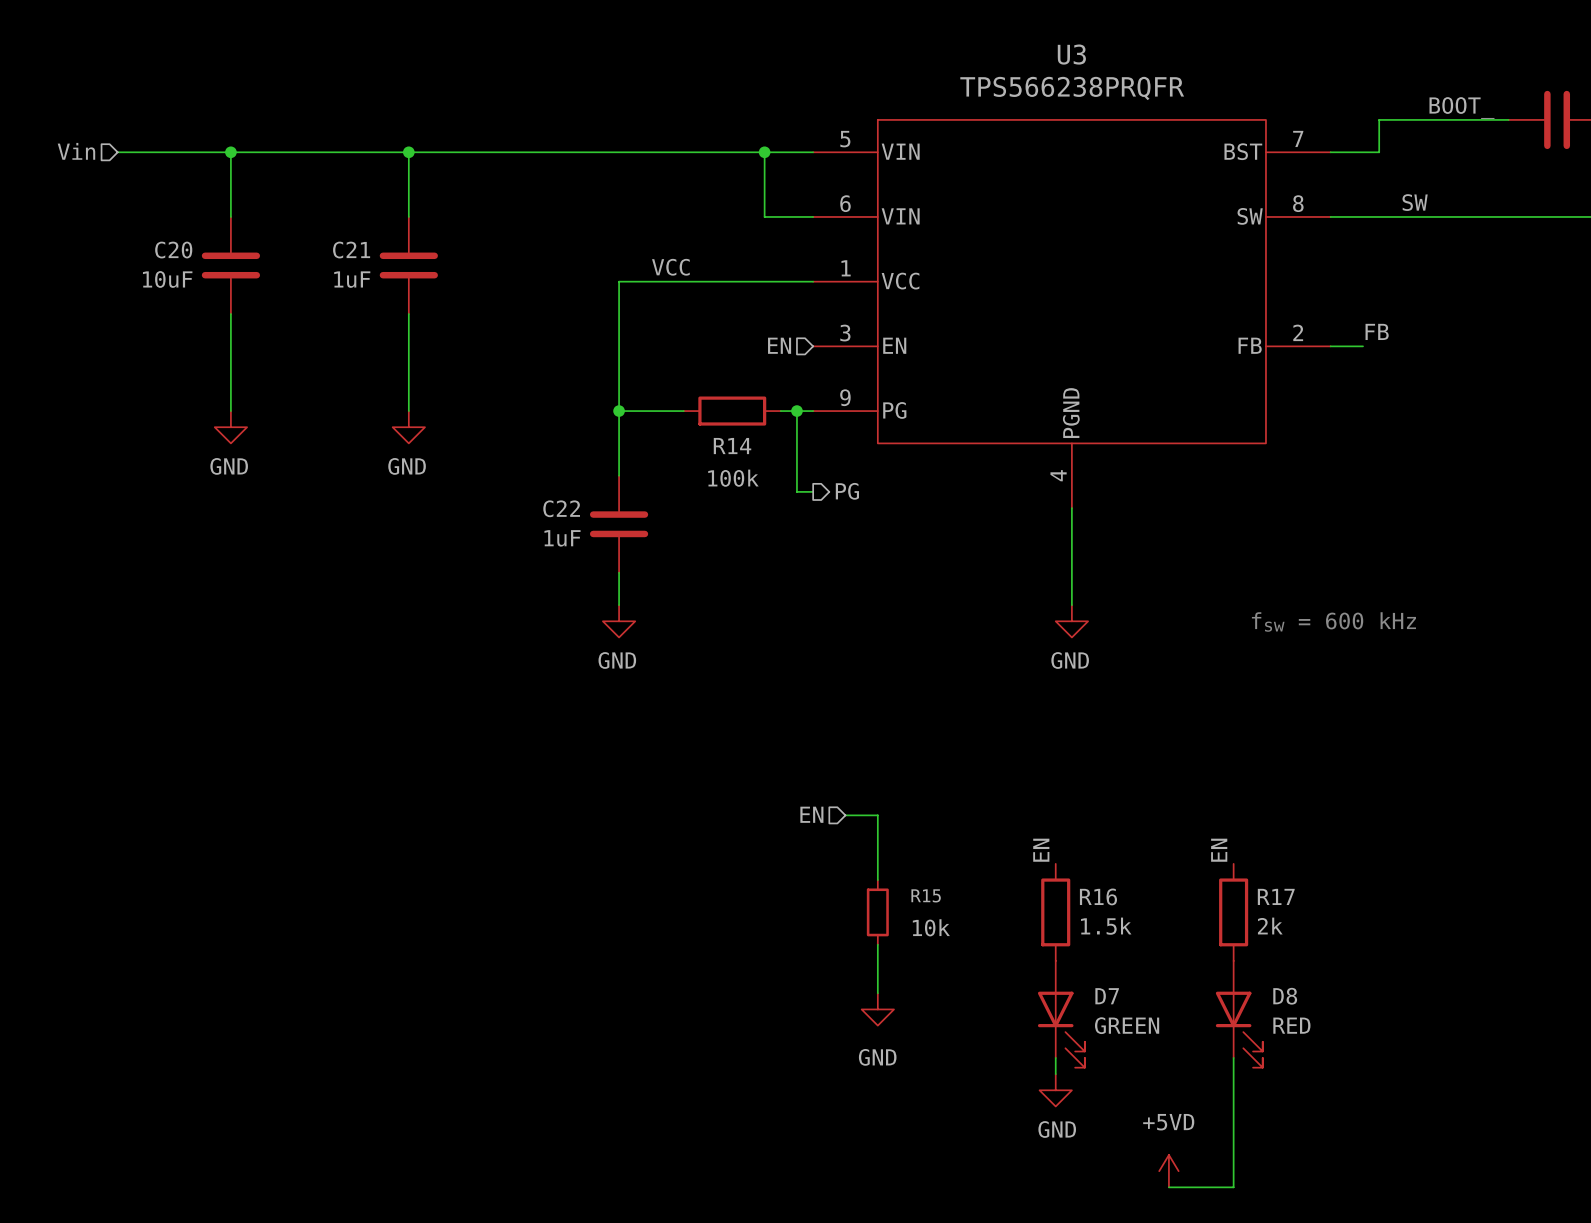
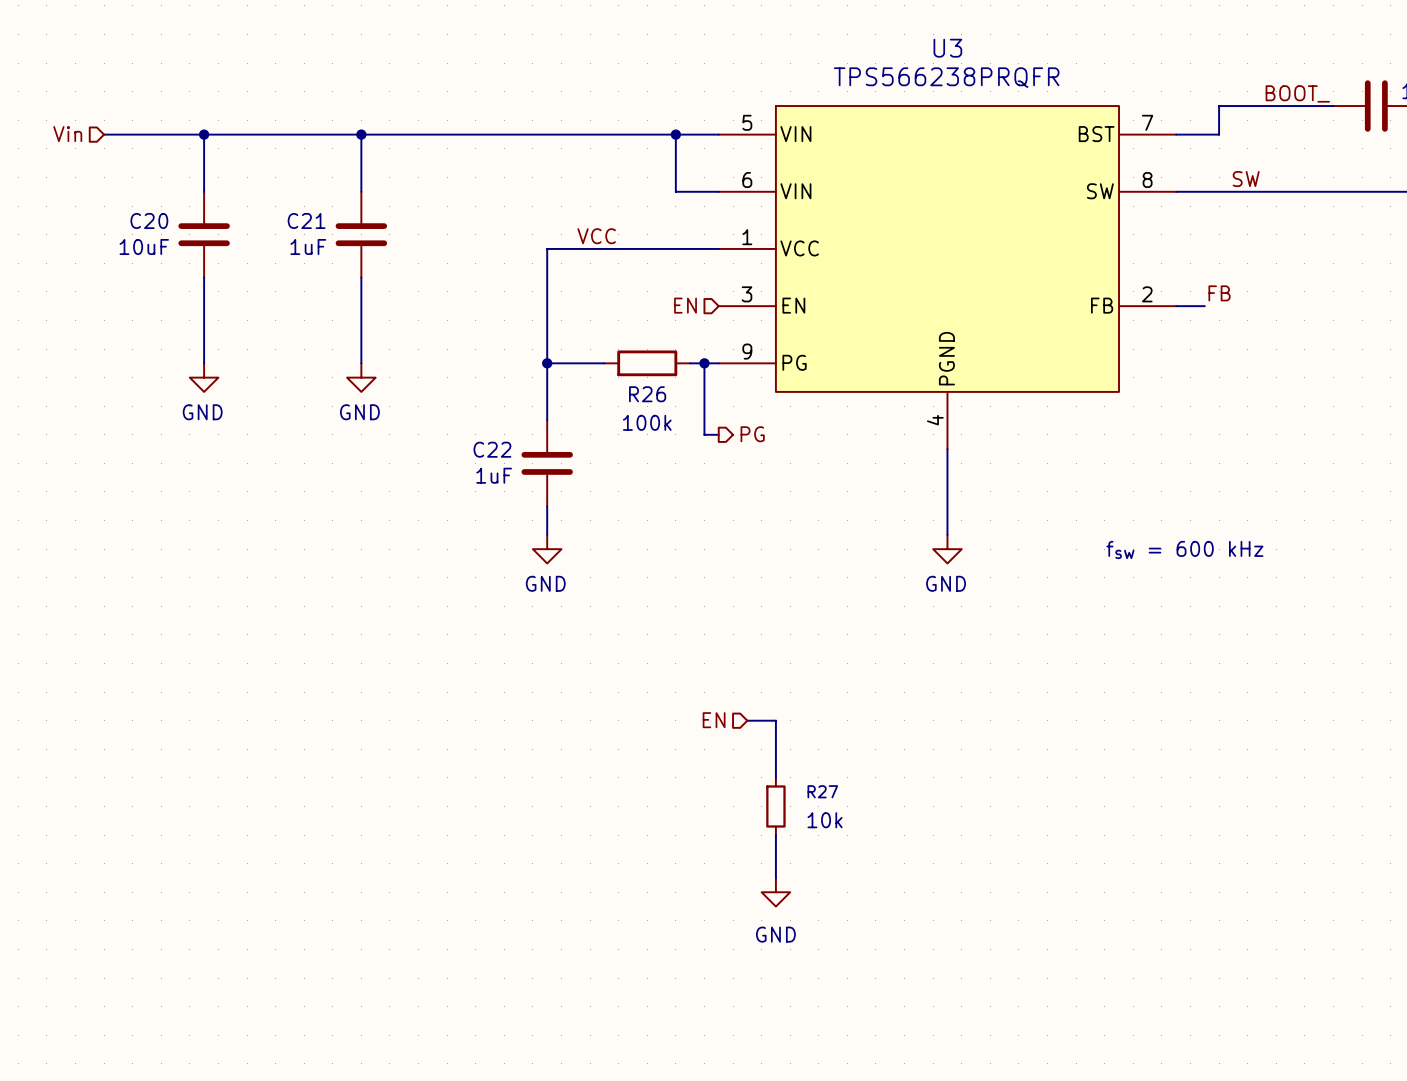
R14 name: R14 (732, 446) -> R26 (647, 394)
label: EN (1041, 850) -> none
label: EN (1219, 850) -> none
R15 name: R15 (926, 895) -> R27 (822, 791)
R16: 1.5k (1055, 912) -> none
R17: 2k (1233, 912) -> none
D7: GREEN (1061, 1014) -> none
D8: RED (1239, 1014) -> none
wire: (1055, 1057) (1055, 1074) -> none
wire: (1233, 1057) (1233, 1187) (1168, 1187) -> none
power symbol: GND (1055, 1090) -> none
power symbol: +5VD (1168, 1171) -> none

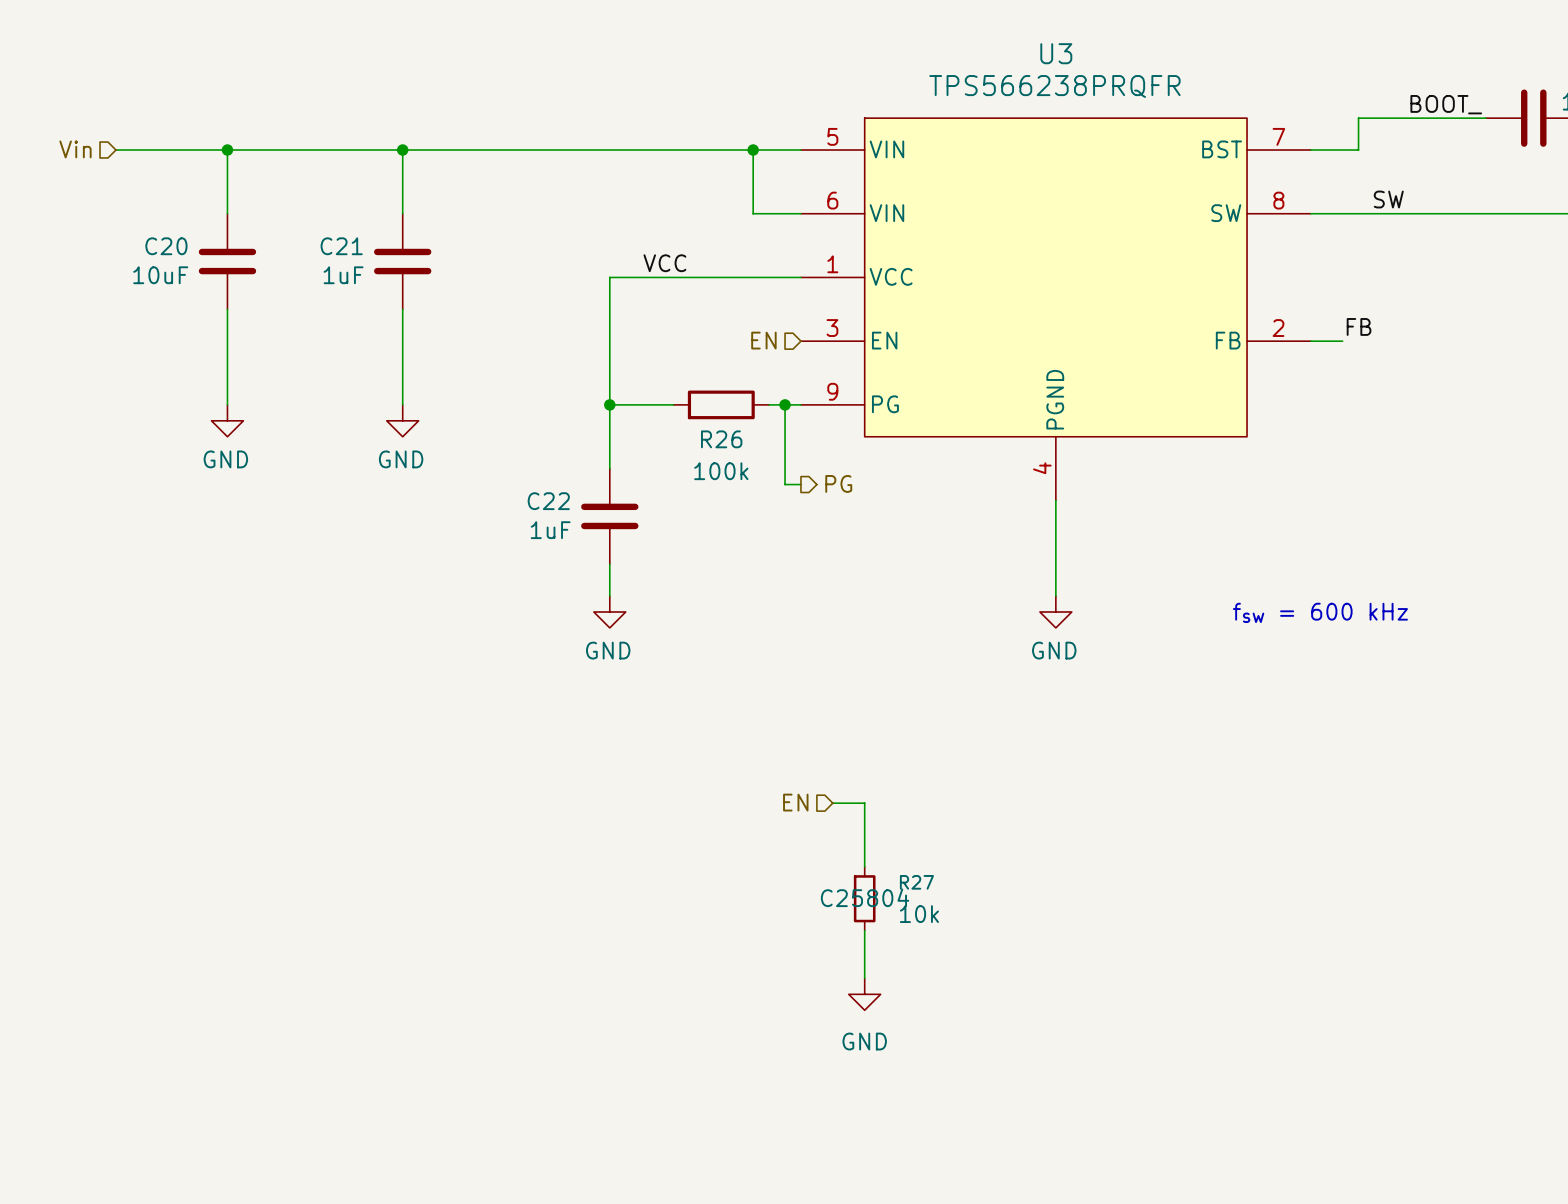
R27 text: none -> C25804 (865, 897)

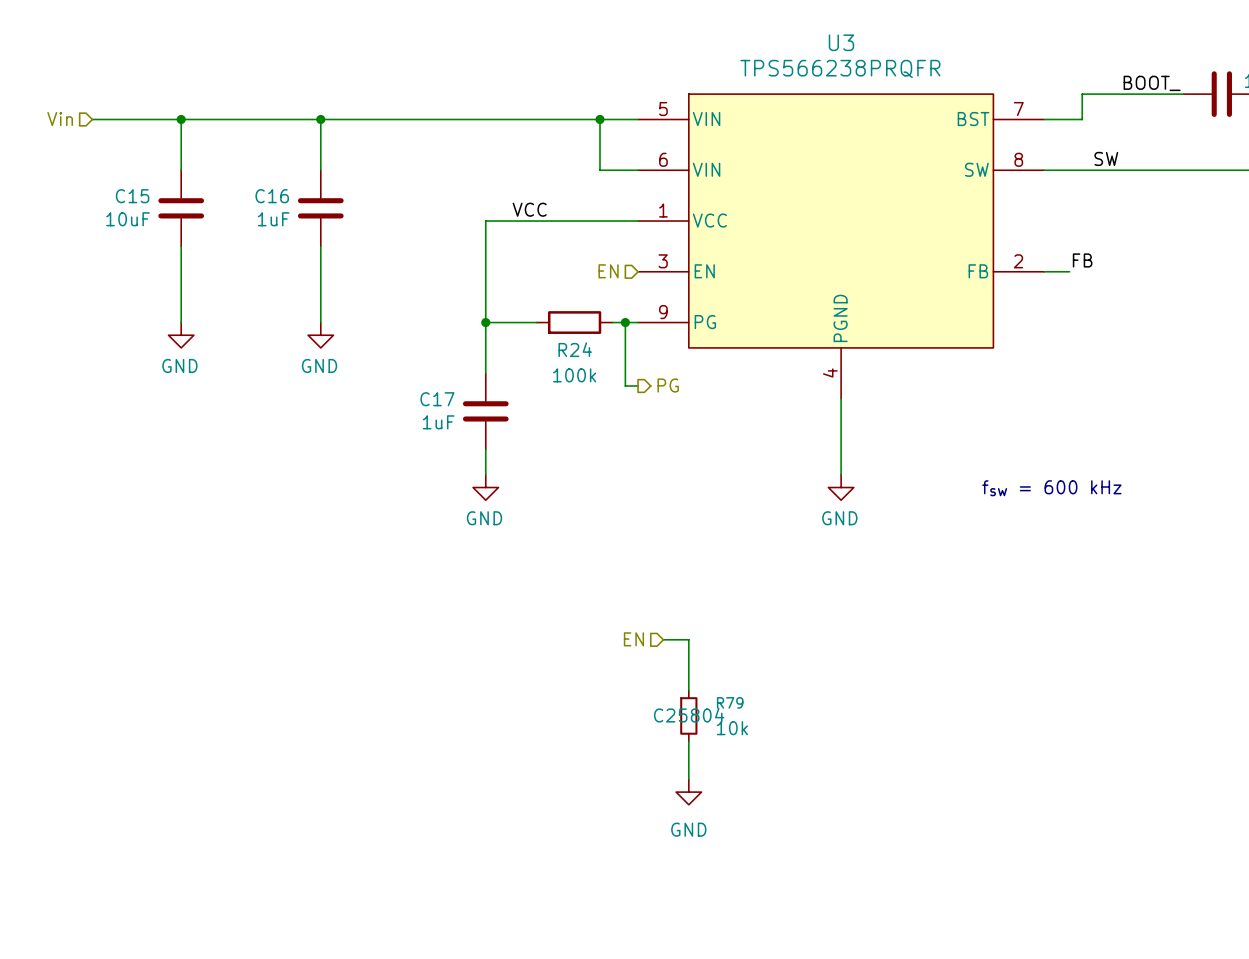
C20 name: C20 (166, 246) -> C15 (132, 196)
C21 name: C21 (341, 246) -> C16 (272, 196)
R26 name: R26 (721, 439) -> R24 (575, 349)
C22 name: C22 (548, 501) -> C17 (437, 399)
R27 name: R27 (916, 882) -> R79 (730, 702)

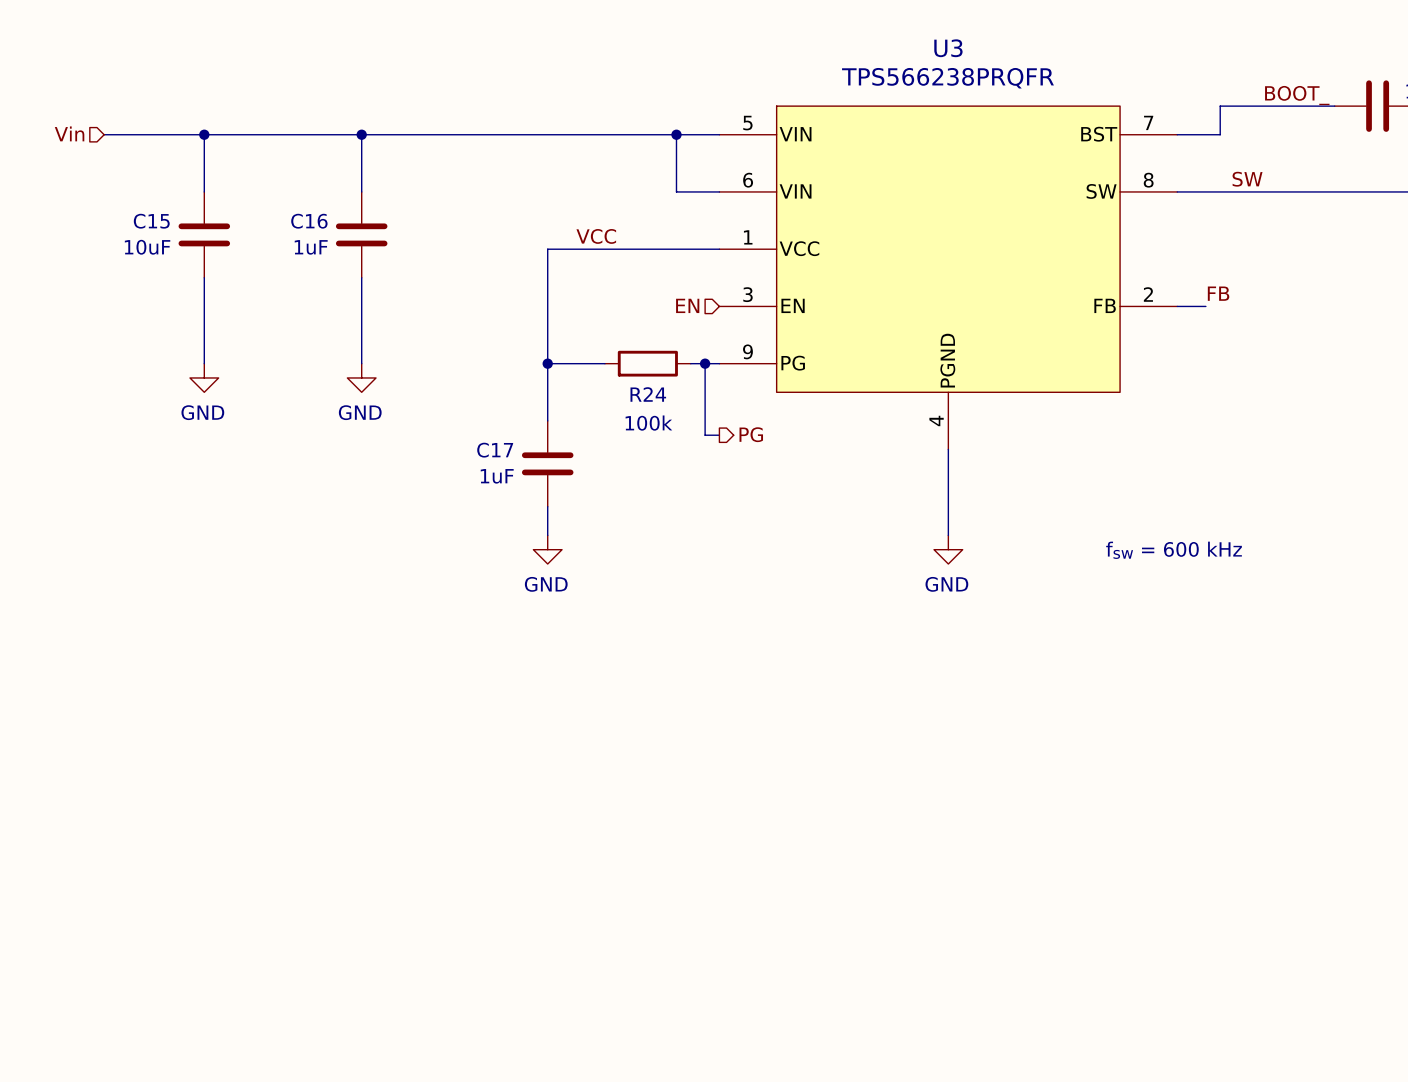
hierarchical label: EN (633, 639) -> none
wire: (663, 639) (688, 639) (688, 690) -> none
R79: 10k (688, 715) -> none
wire: (688, 741) (688, 779) -> none
power symbol: GND (688, 792) -> none

